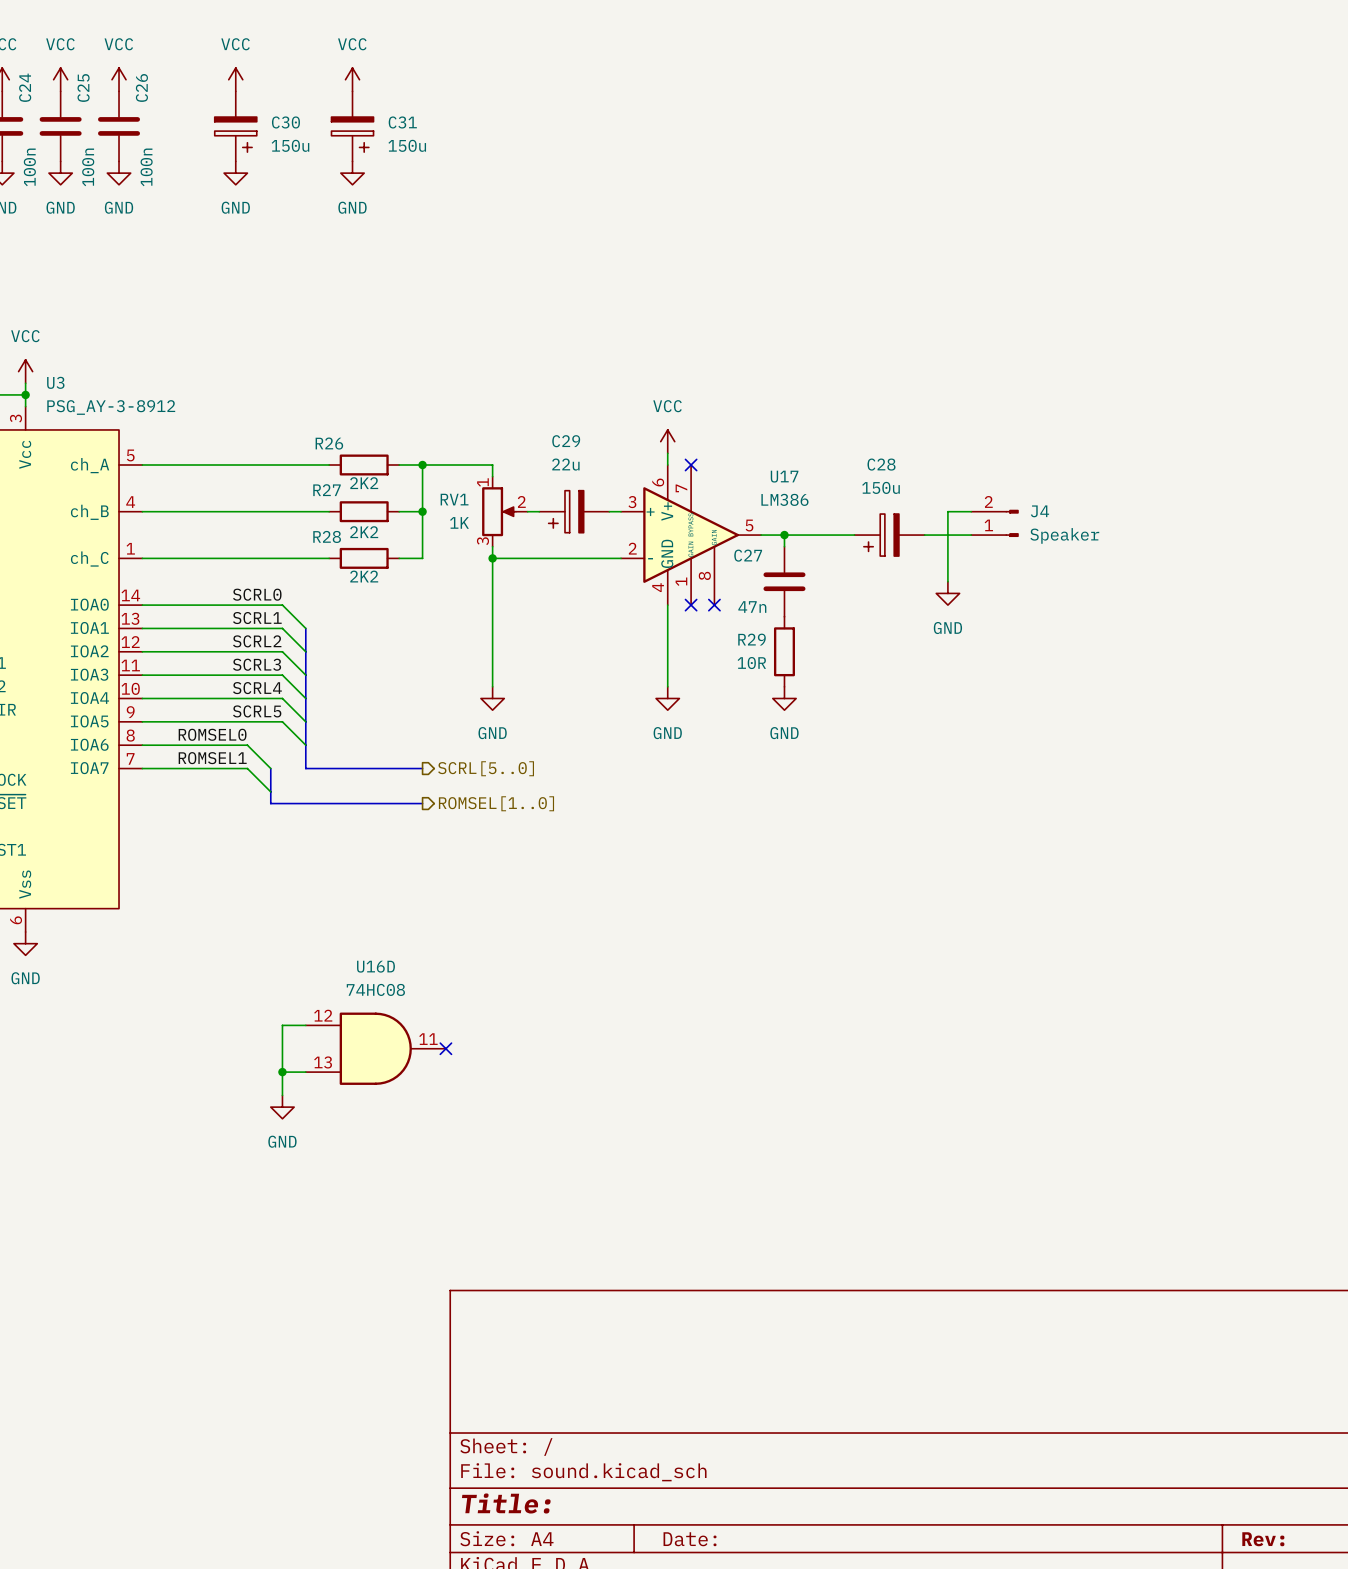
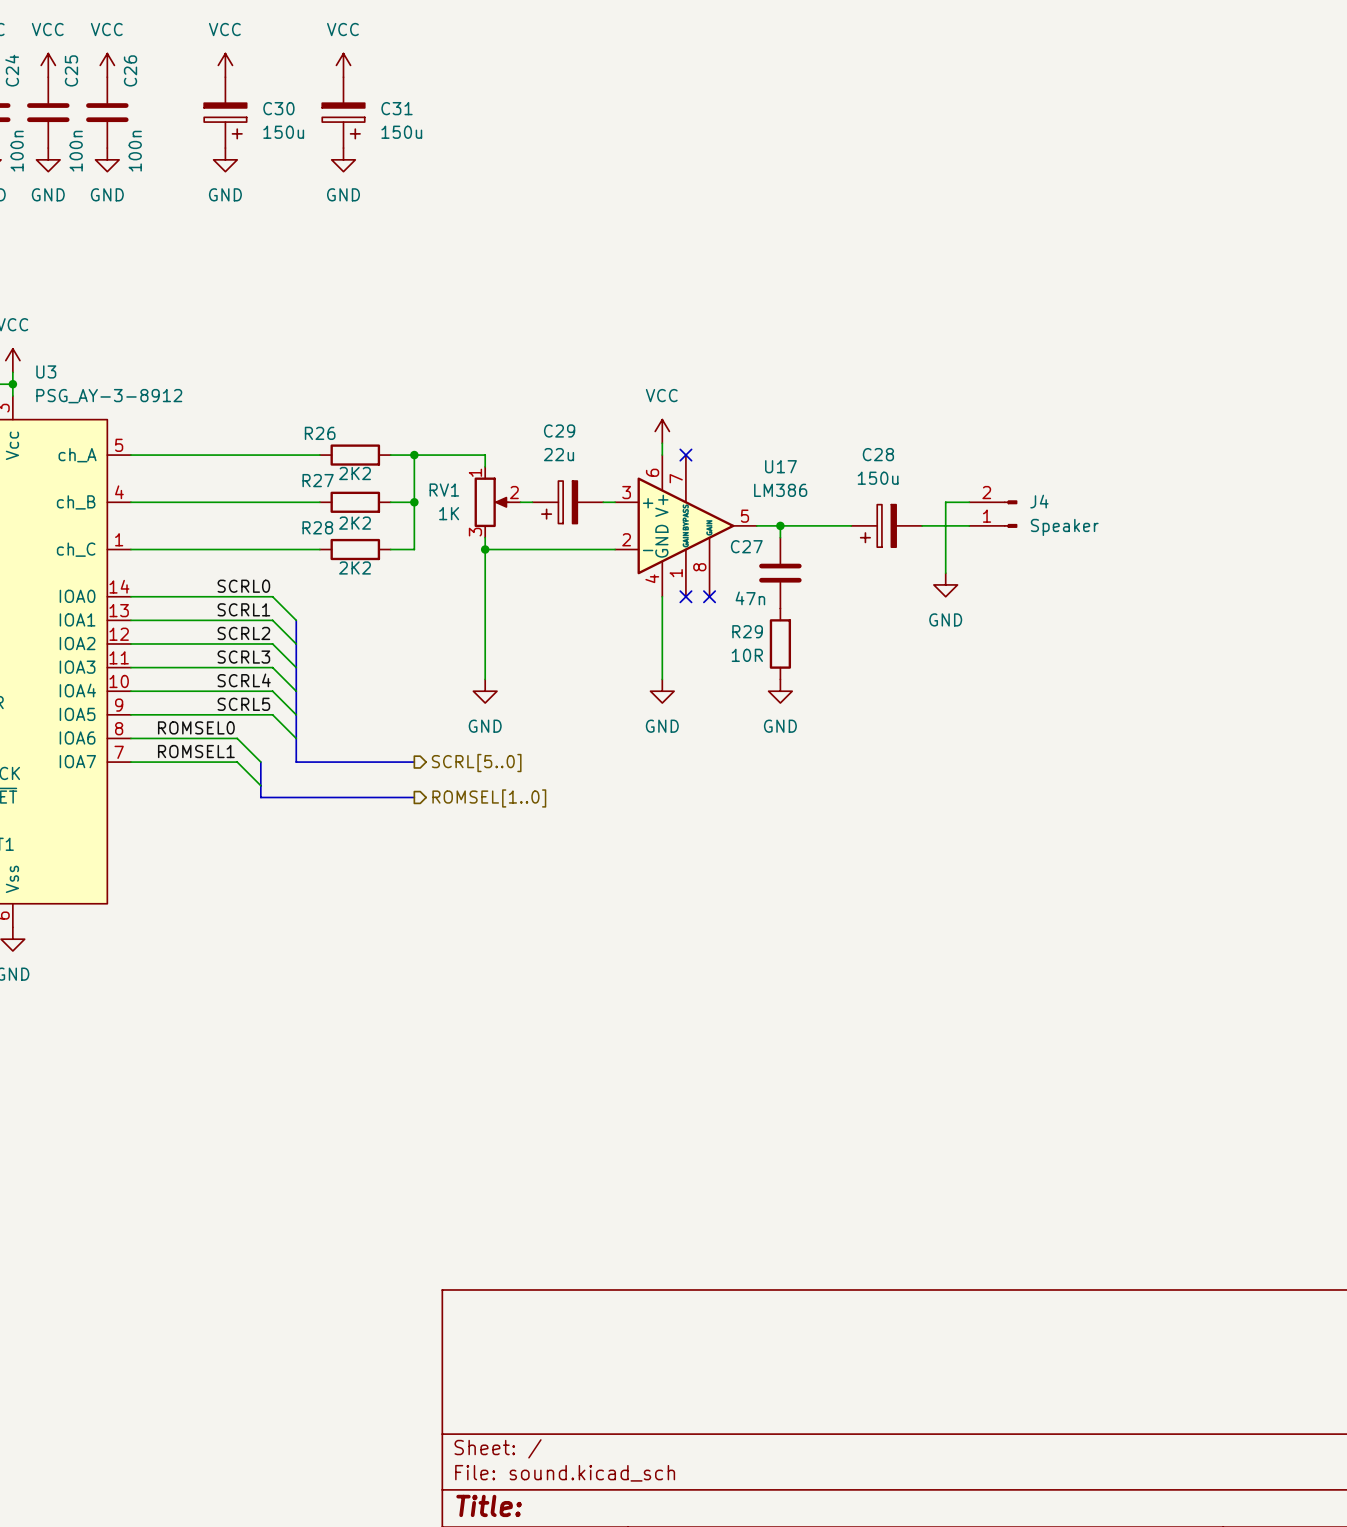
wire: (305, 1025) (282, 1025) (282, 1095) -> none
U16D: 74HC08 (375, 1048) -> none
no-connect mark: (445, 1048) -> none
wire: (282, 1072) (305, 1072) -> none
junction: (282, 1072) -> none
power symbol: GND (282, 1107) -> none

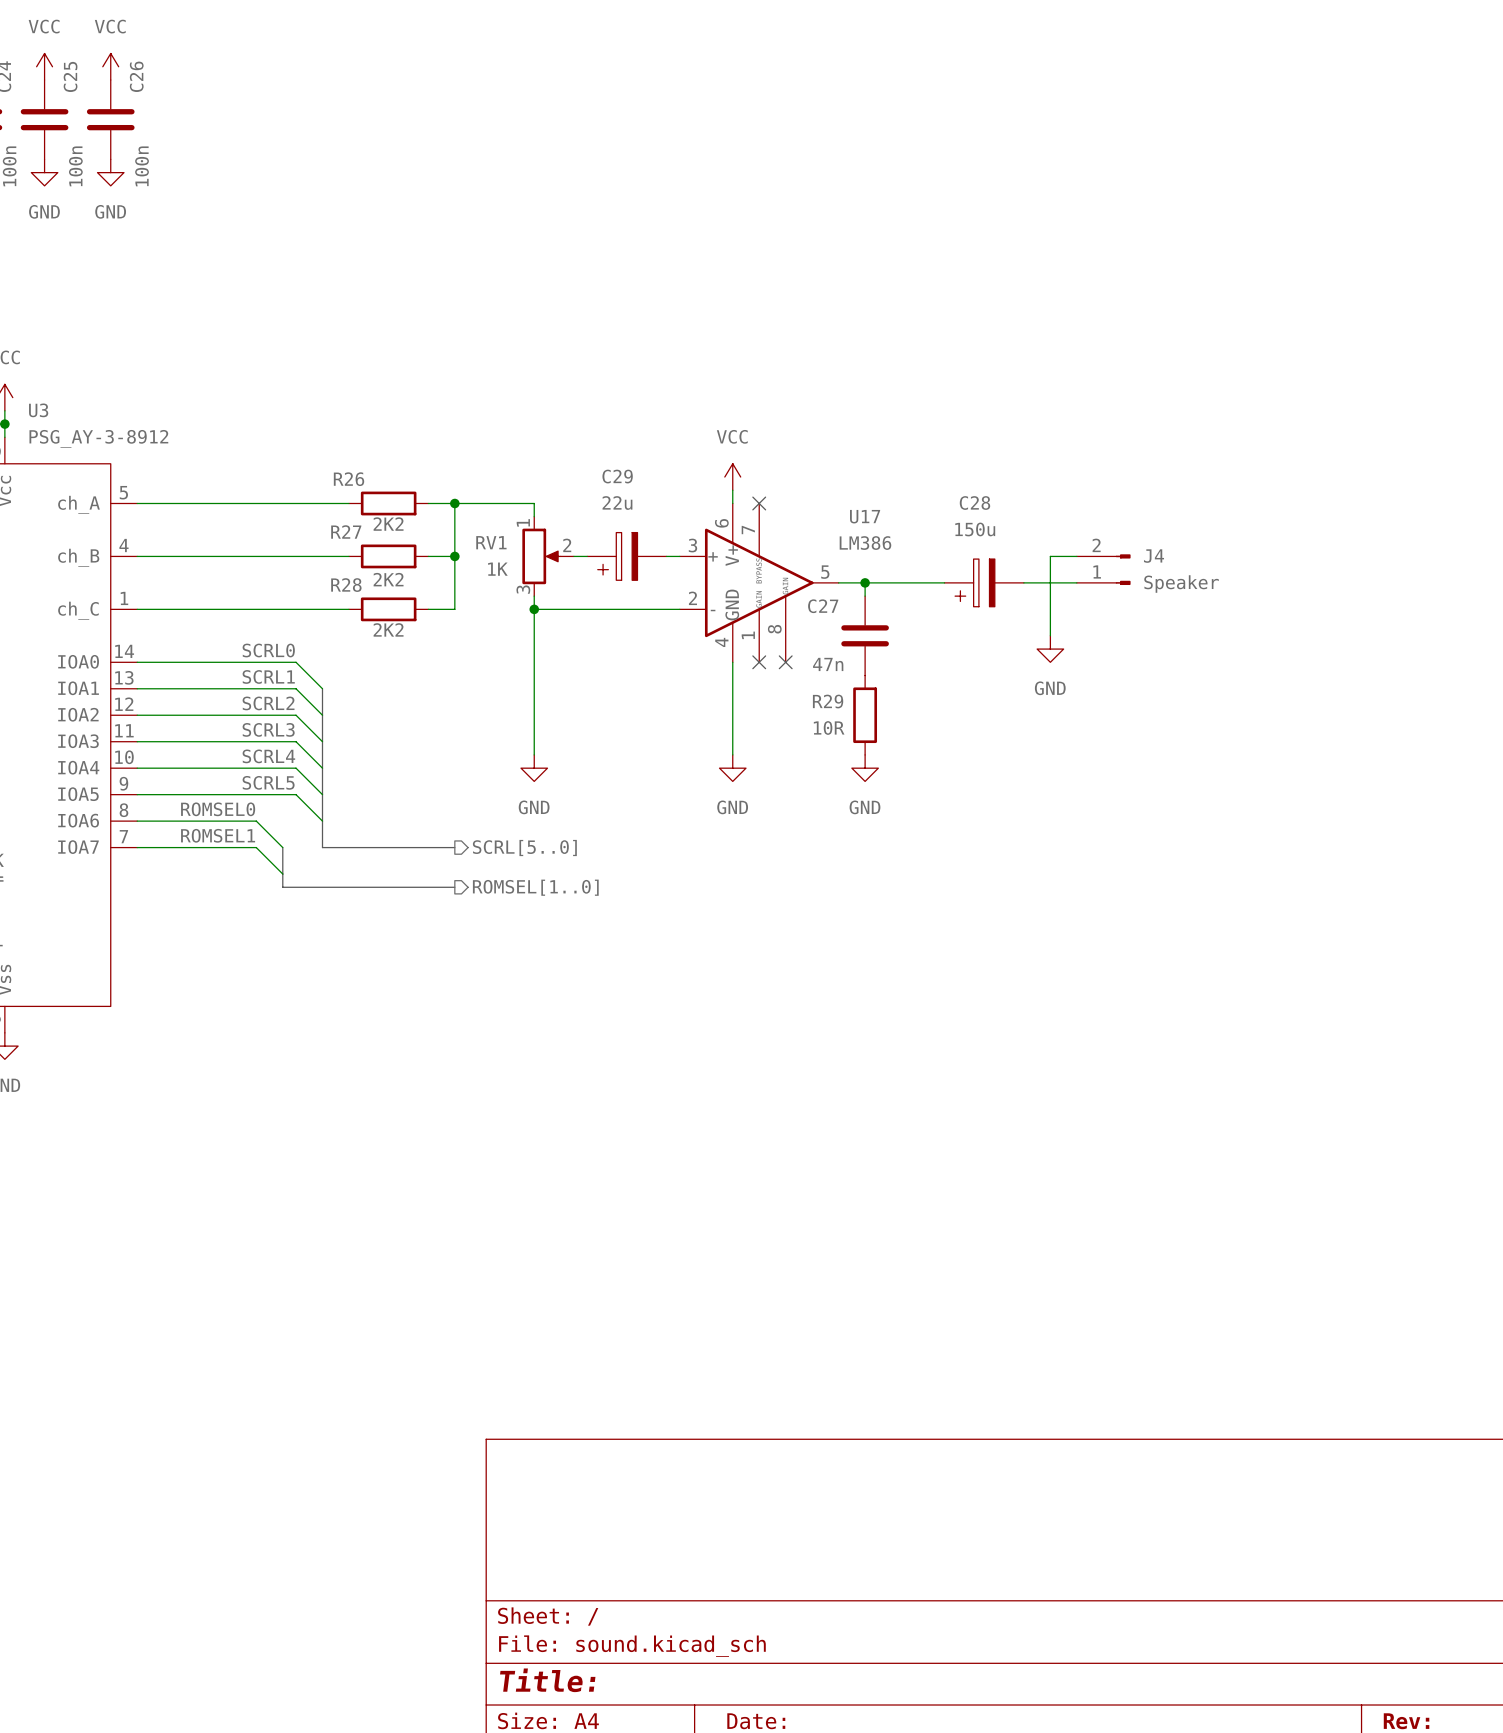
power symbol: VCC (225, 65) -> none
power symbol: VCC (343, 65) -> none
C30: 150u (225, 112) -> none
C31: 150u (343, 112) -> none
power symbol: GND (225, 159) -> none
power symbol: GND (343, 159) -> none

